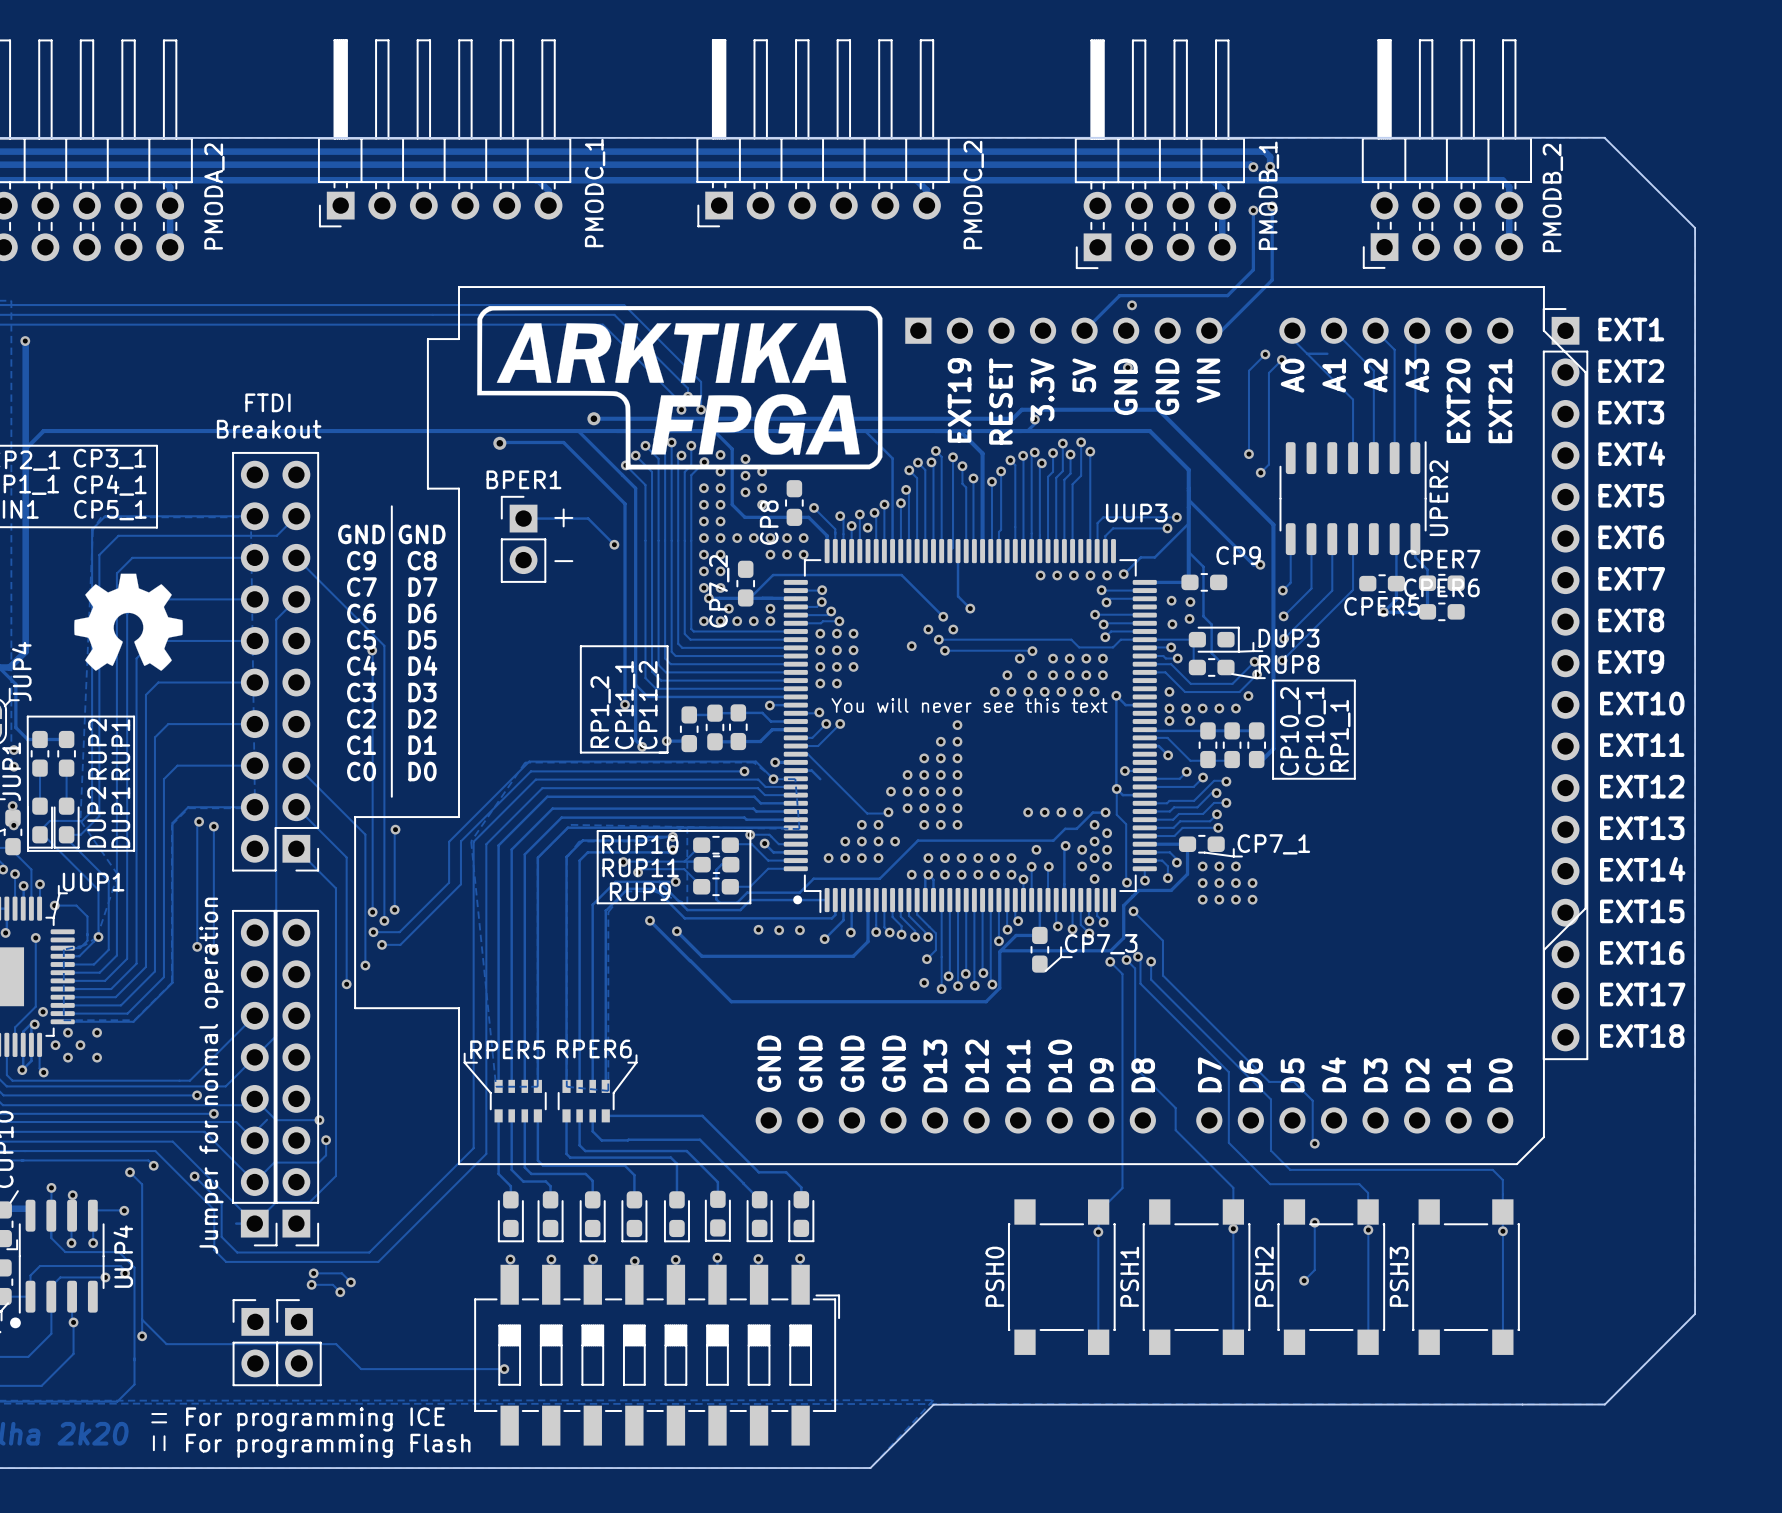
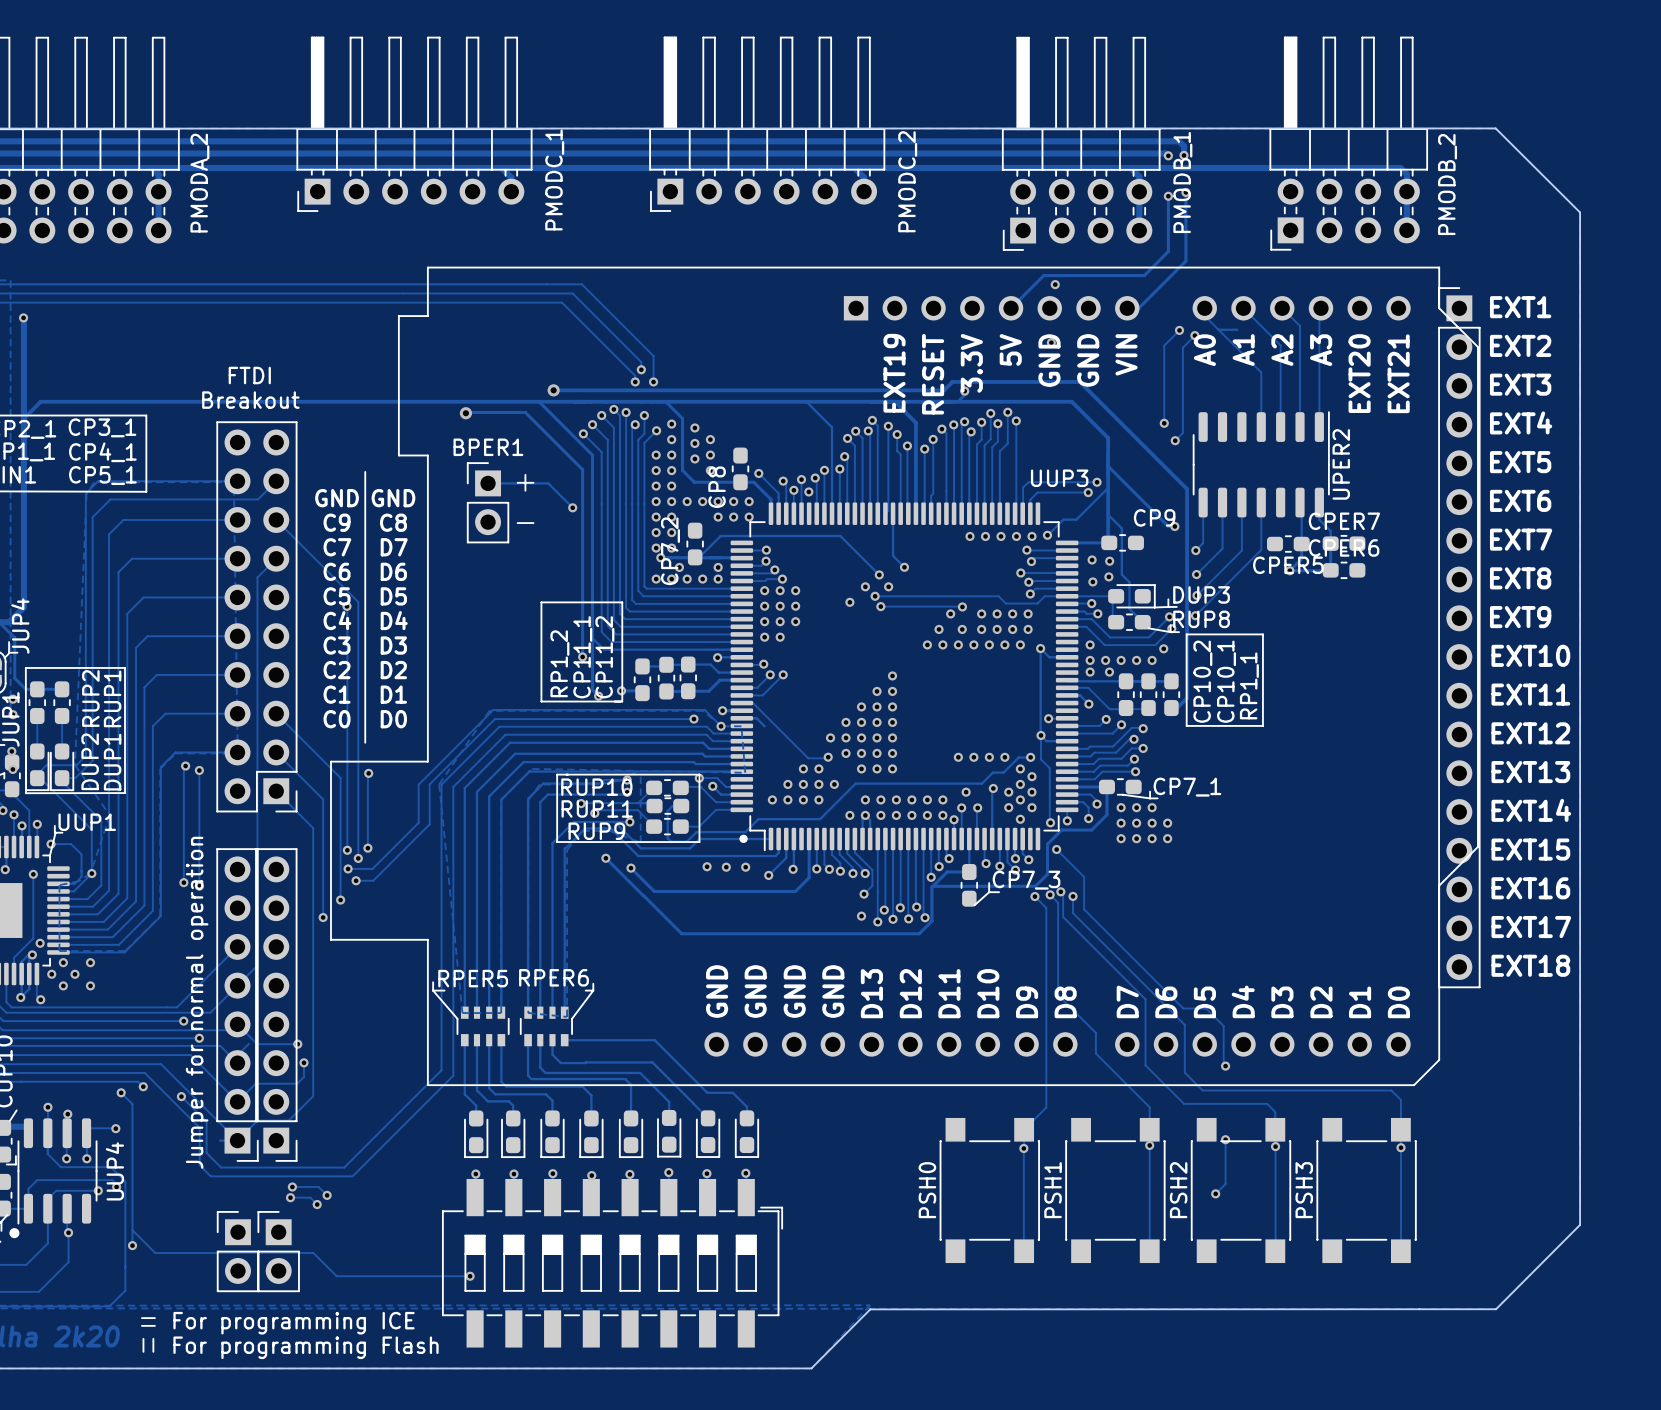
drawing: [477, 306, 883, 470] -> none
drawing: [74, 573, 183, 671] -> none
text: You will never see this text (969, 705) -> none

